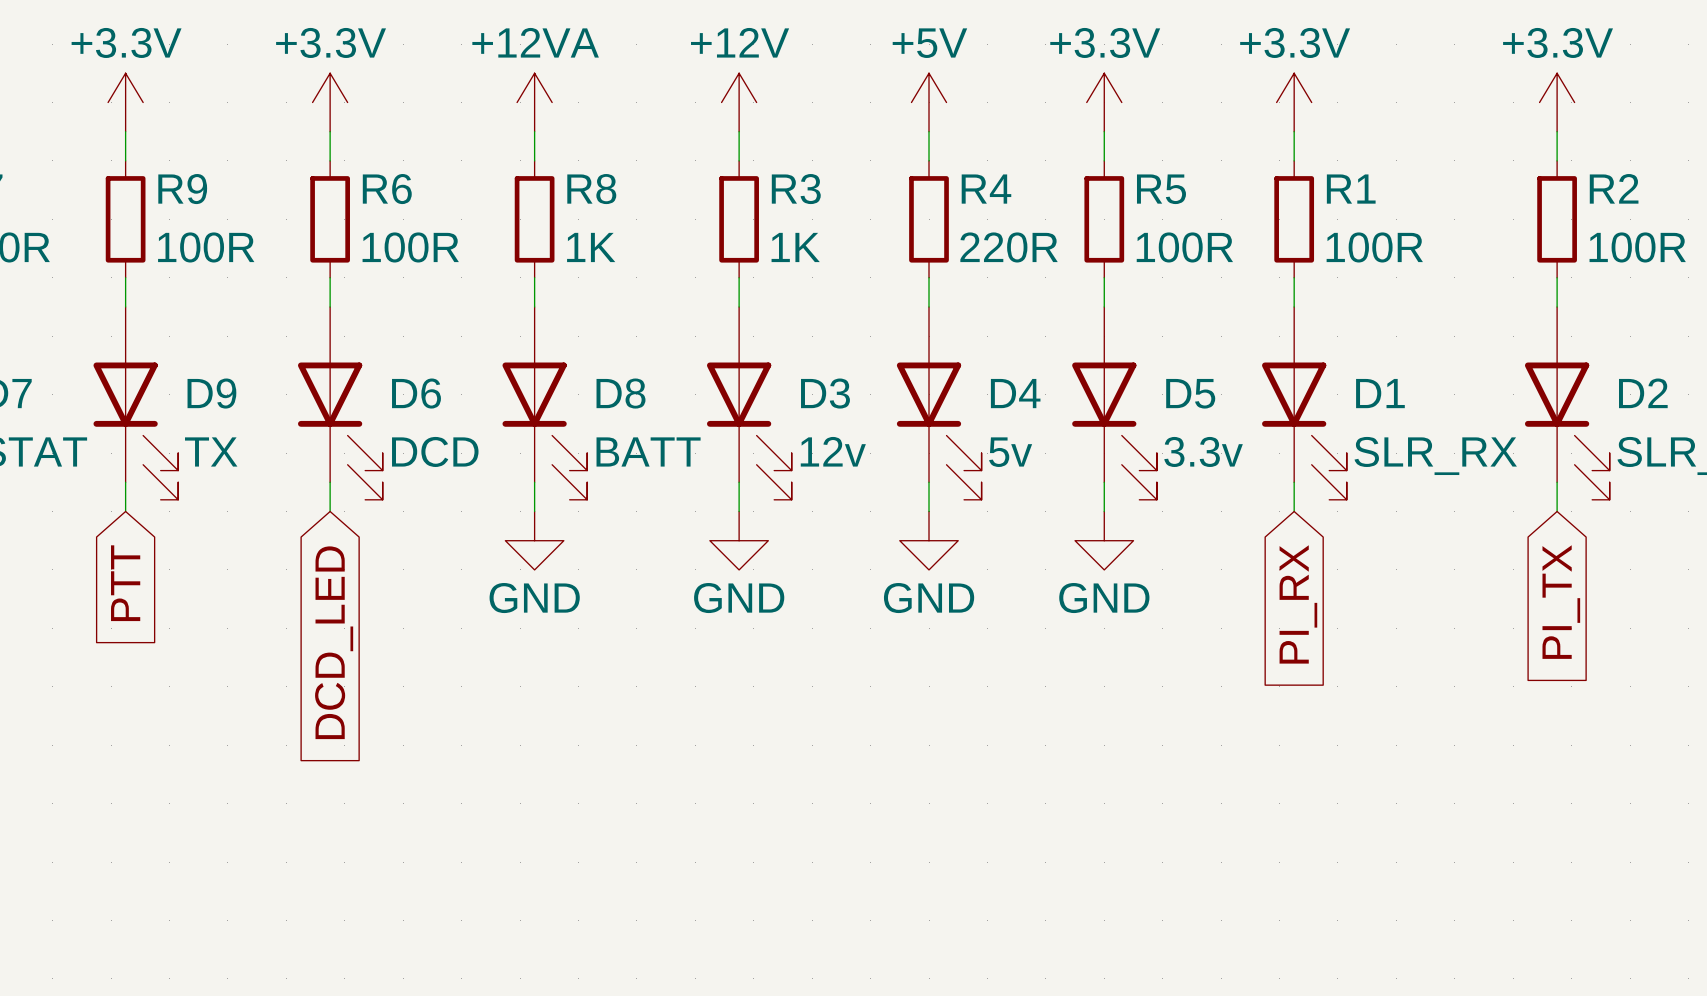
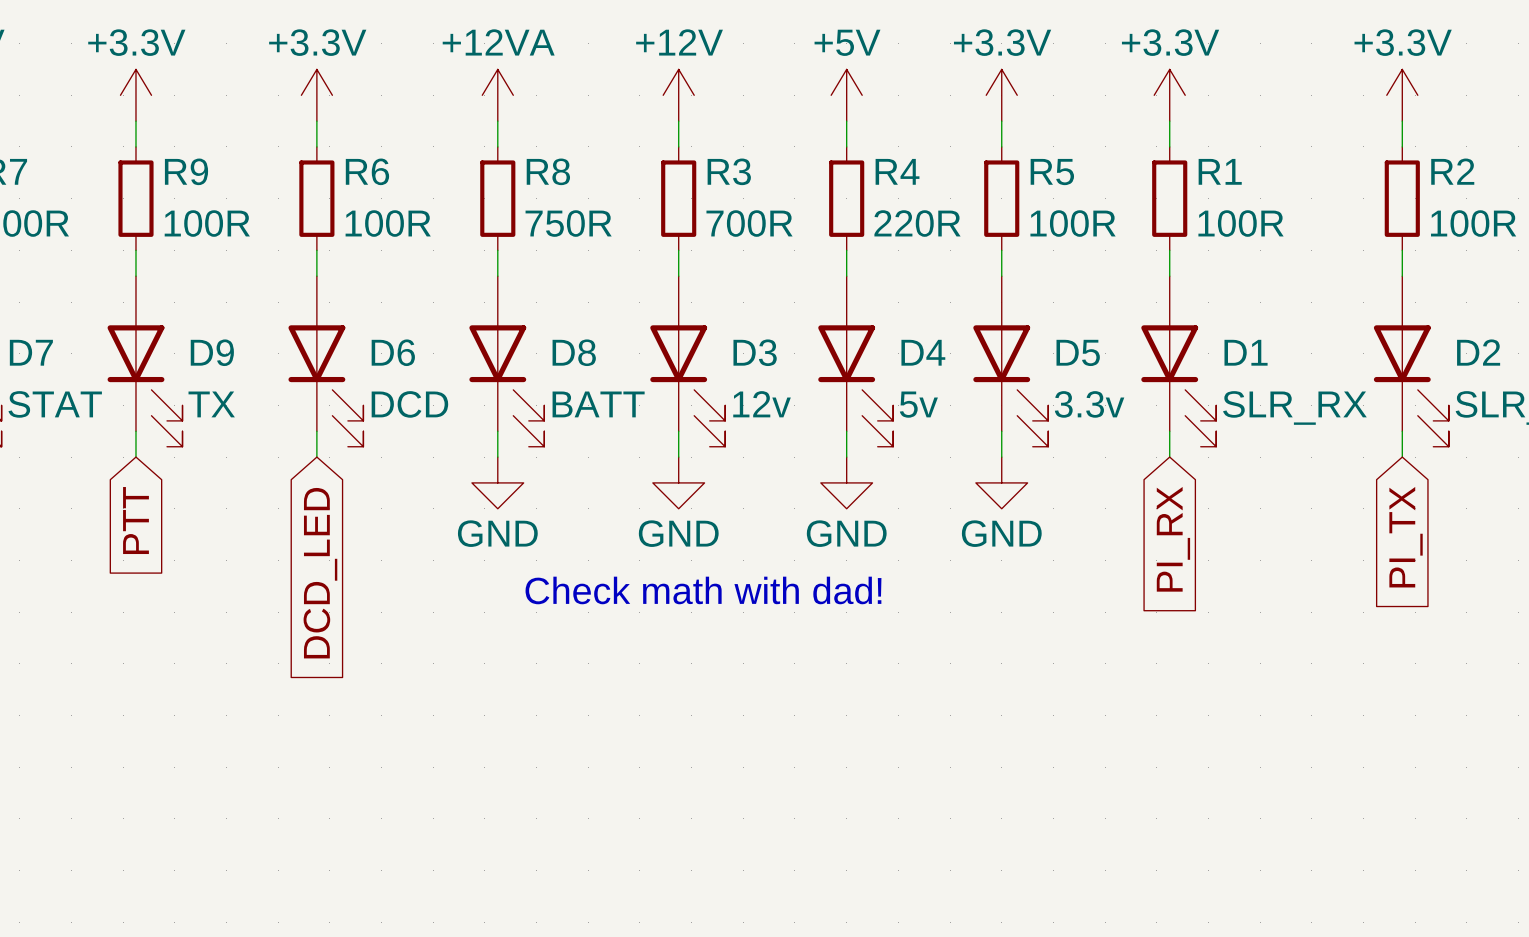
R8 value: 1K (591, 247) -> 750R (568, 223)
R3 value: 1K (795, 247) -> 700R (749, 223)
text: none -> Check math with dad! (703, 590)

